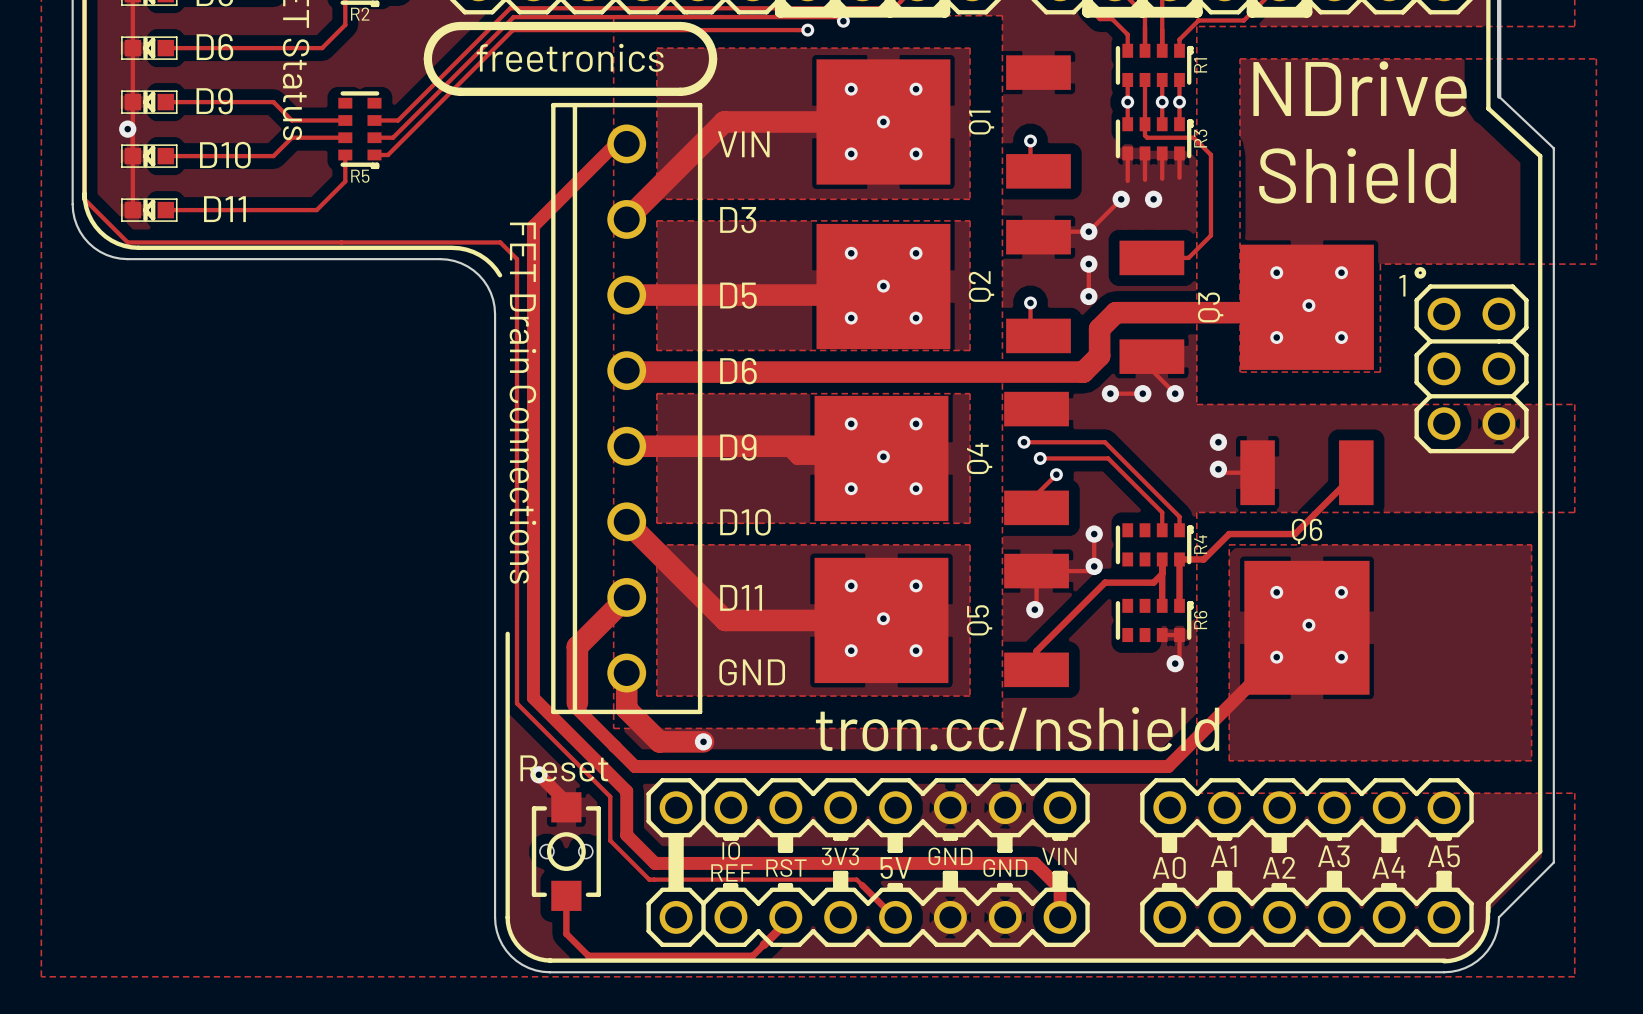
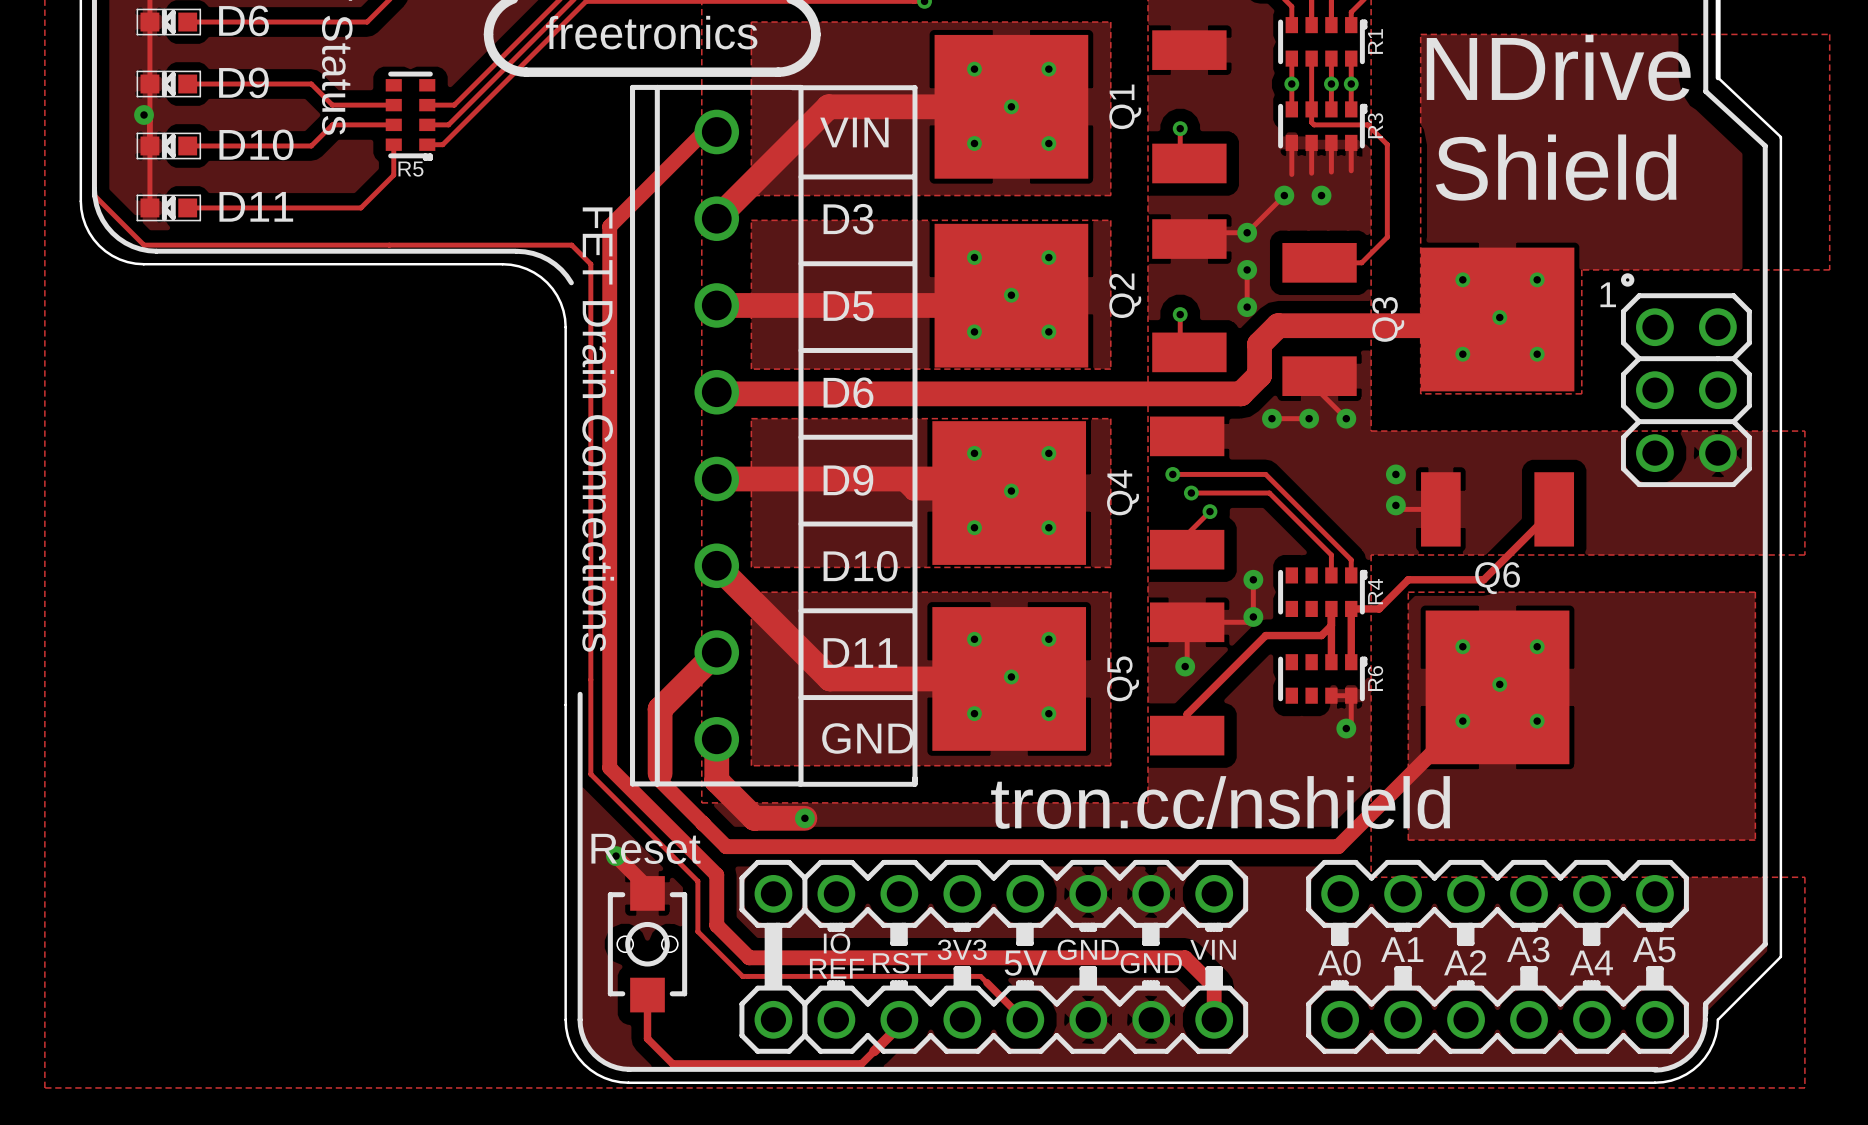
line: none -> (792, 87) (914, 87) (914, 784) (799, 784)
line: none -> (800, 176) (912, 176)
line: none -> (800, 263) (912, 263)
line: none -> (800, 350) (912, 350)
line: none -> (800, 437) (912, 437)
line: none -> (800, 524) (912, 524)
line: none -> (800, 610) (912, 610)
line: none -> (800, 697) (912, 697)
text position: tron.cc/nshield (1017, 729) -> tron.cc/nshield (1220, 802)

